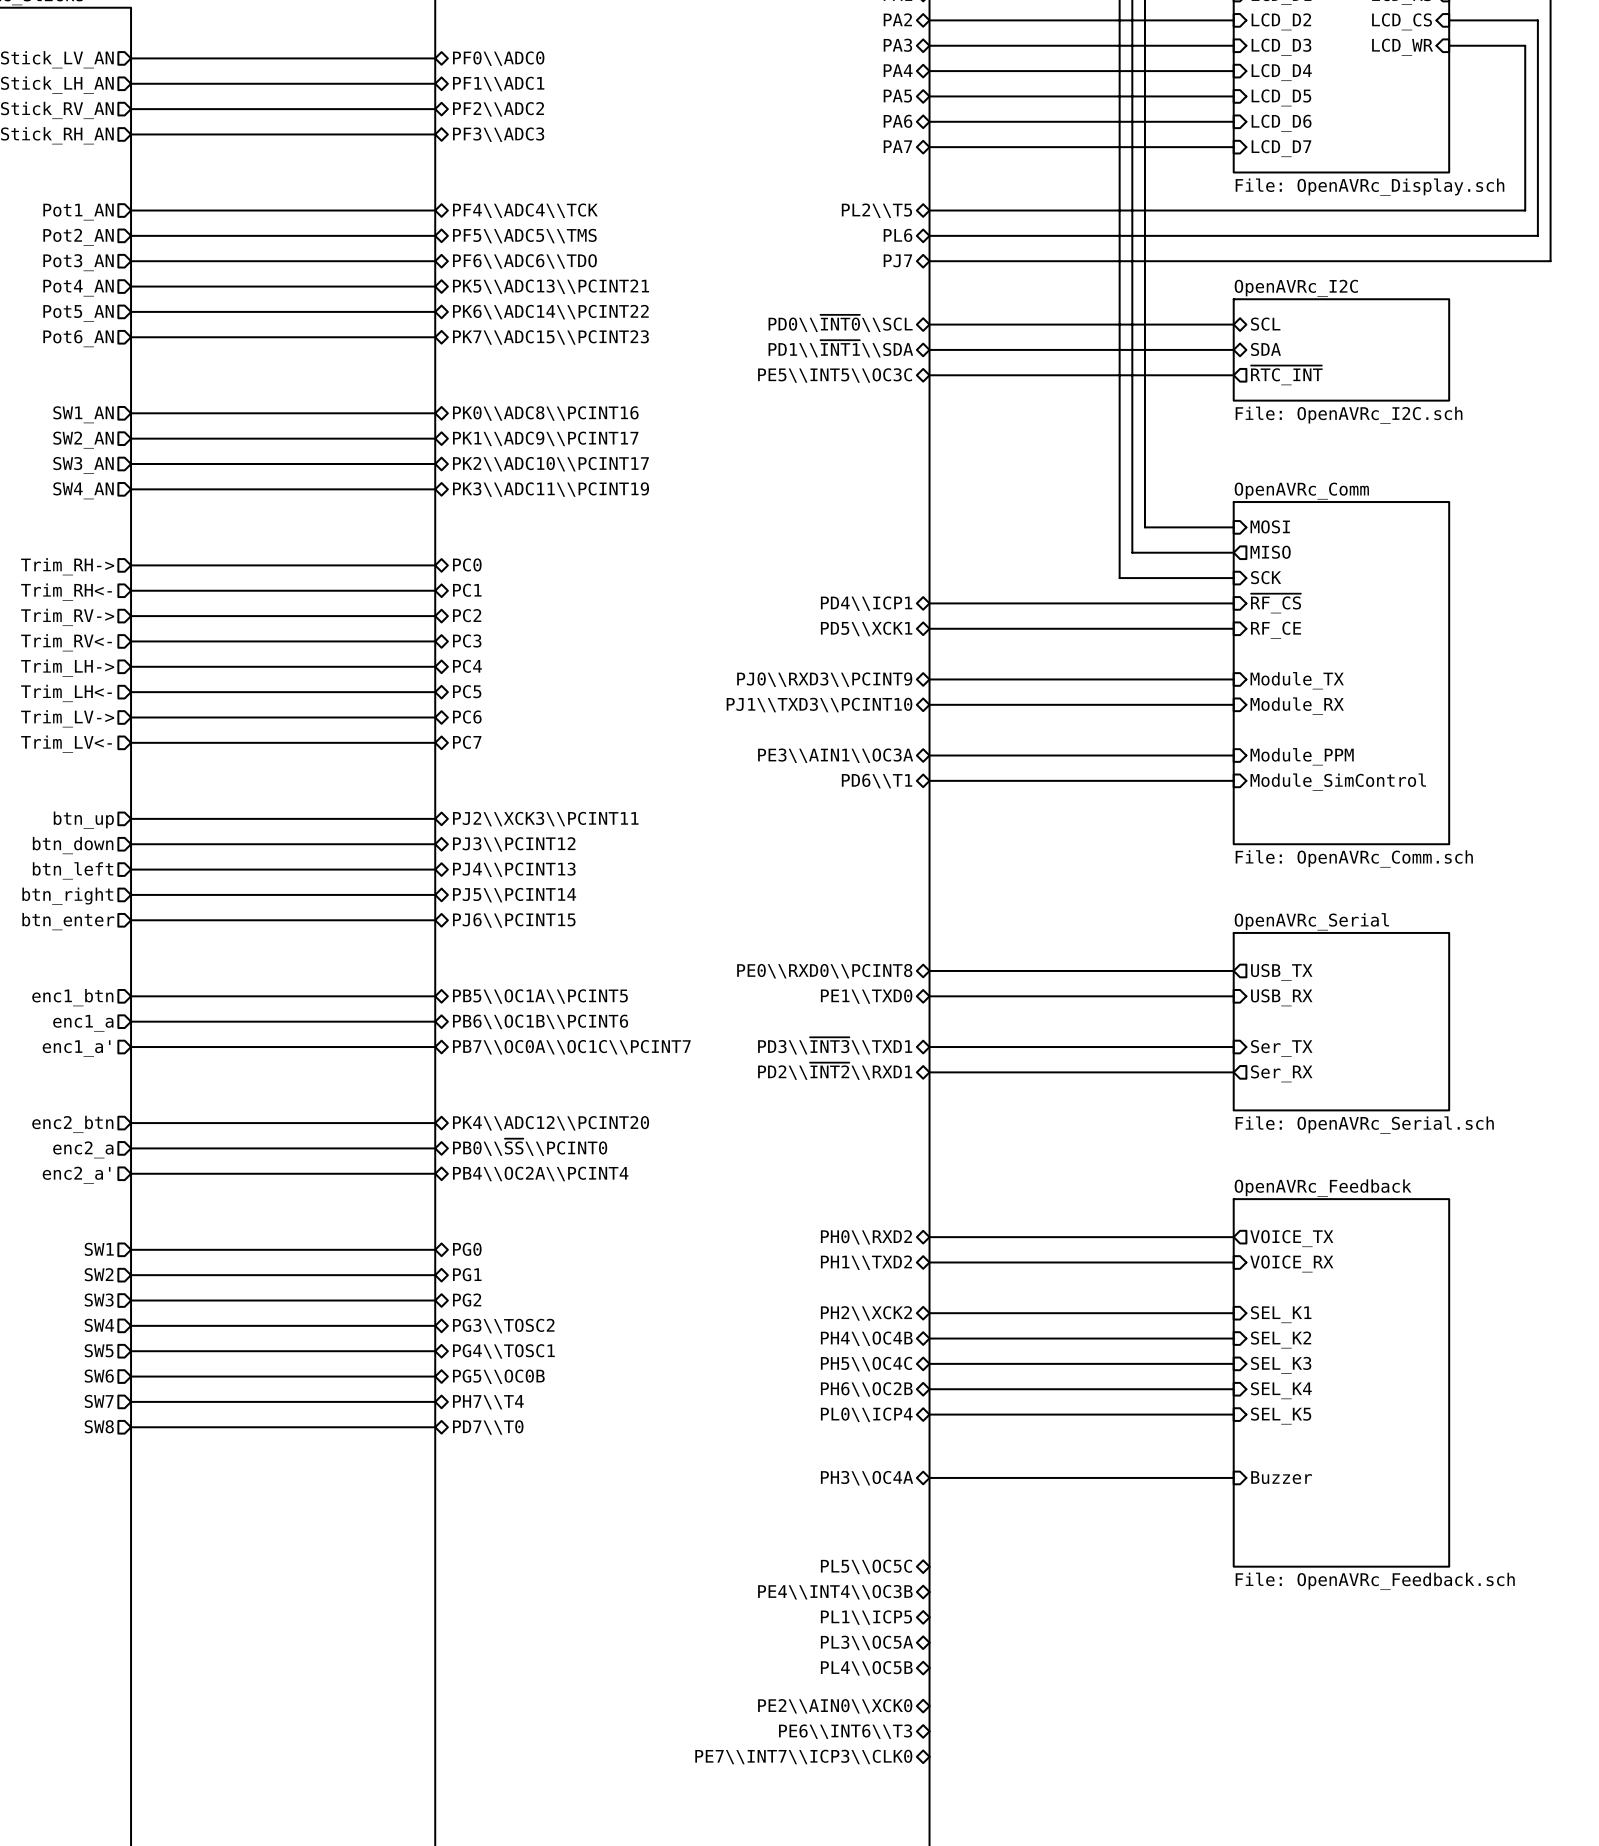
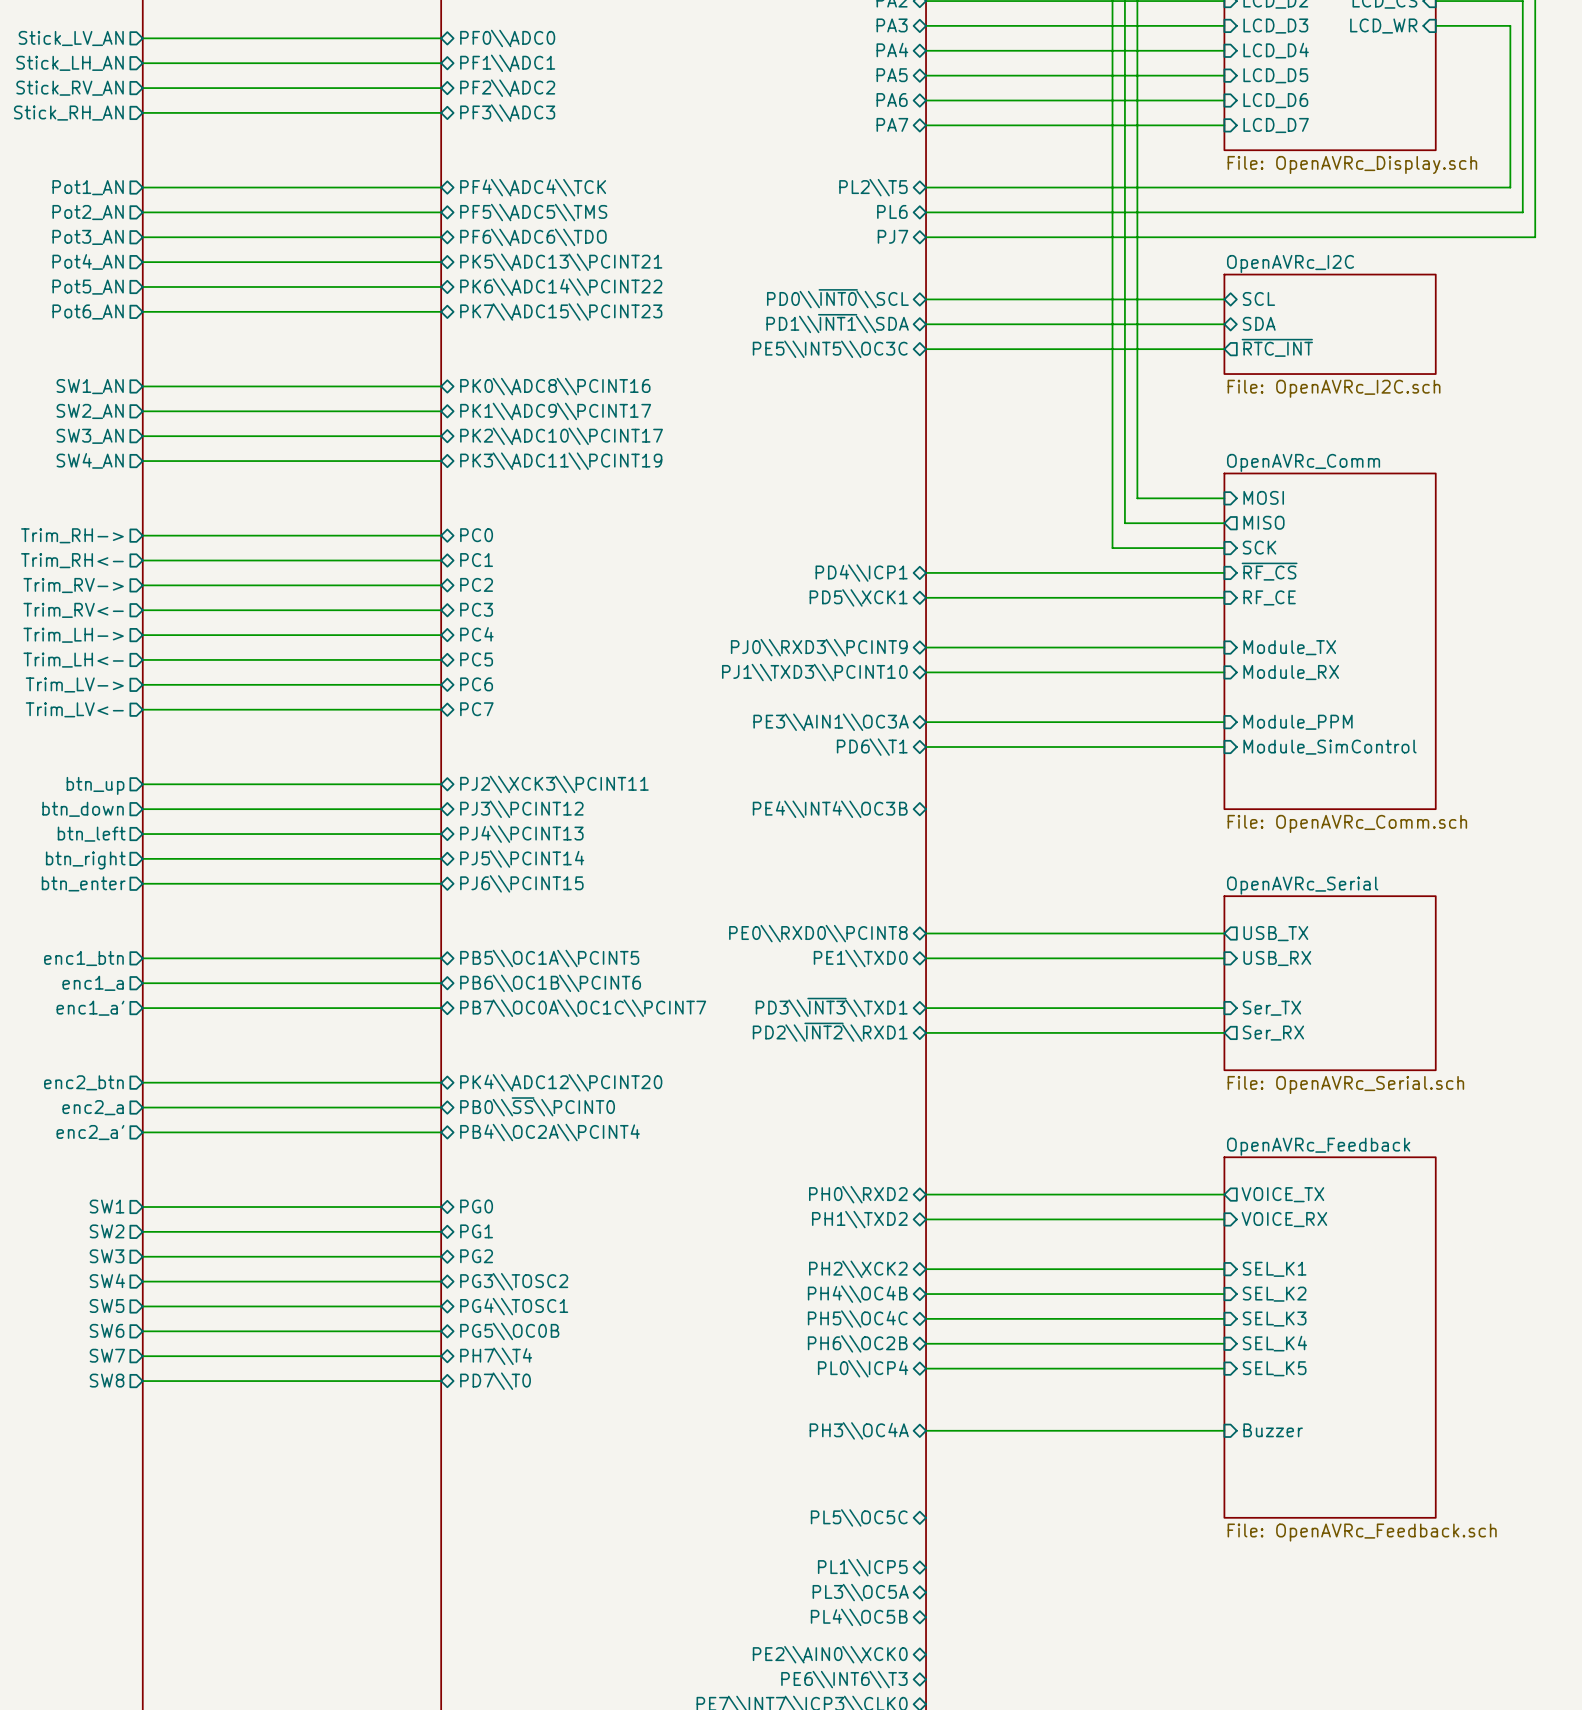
sheet pin: none -> PE4\\INT4\\OC3B (830, 809)
sheet pin: PE4\\INT4\\OC3B (835, 1592) -> none

